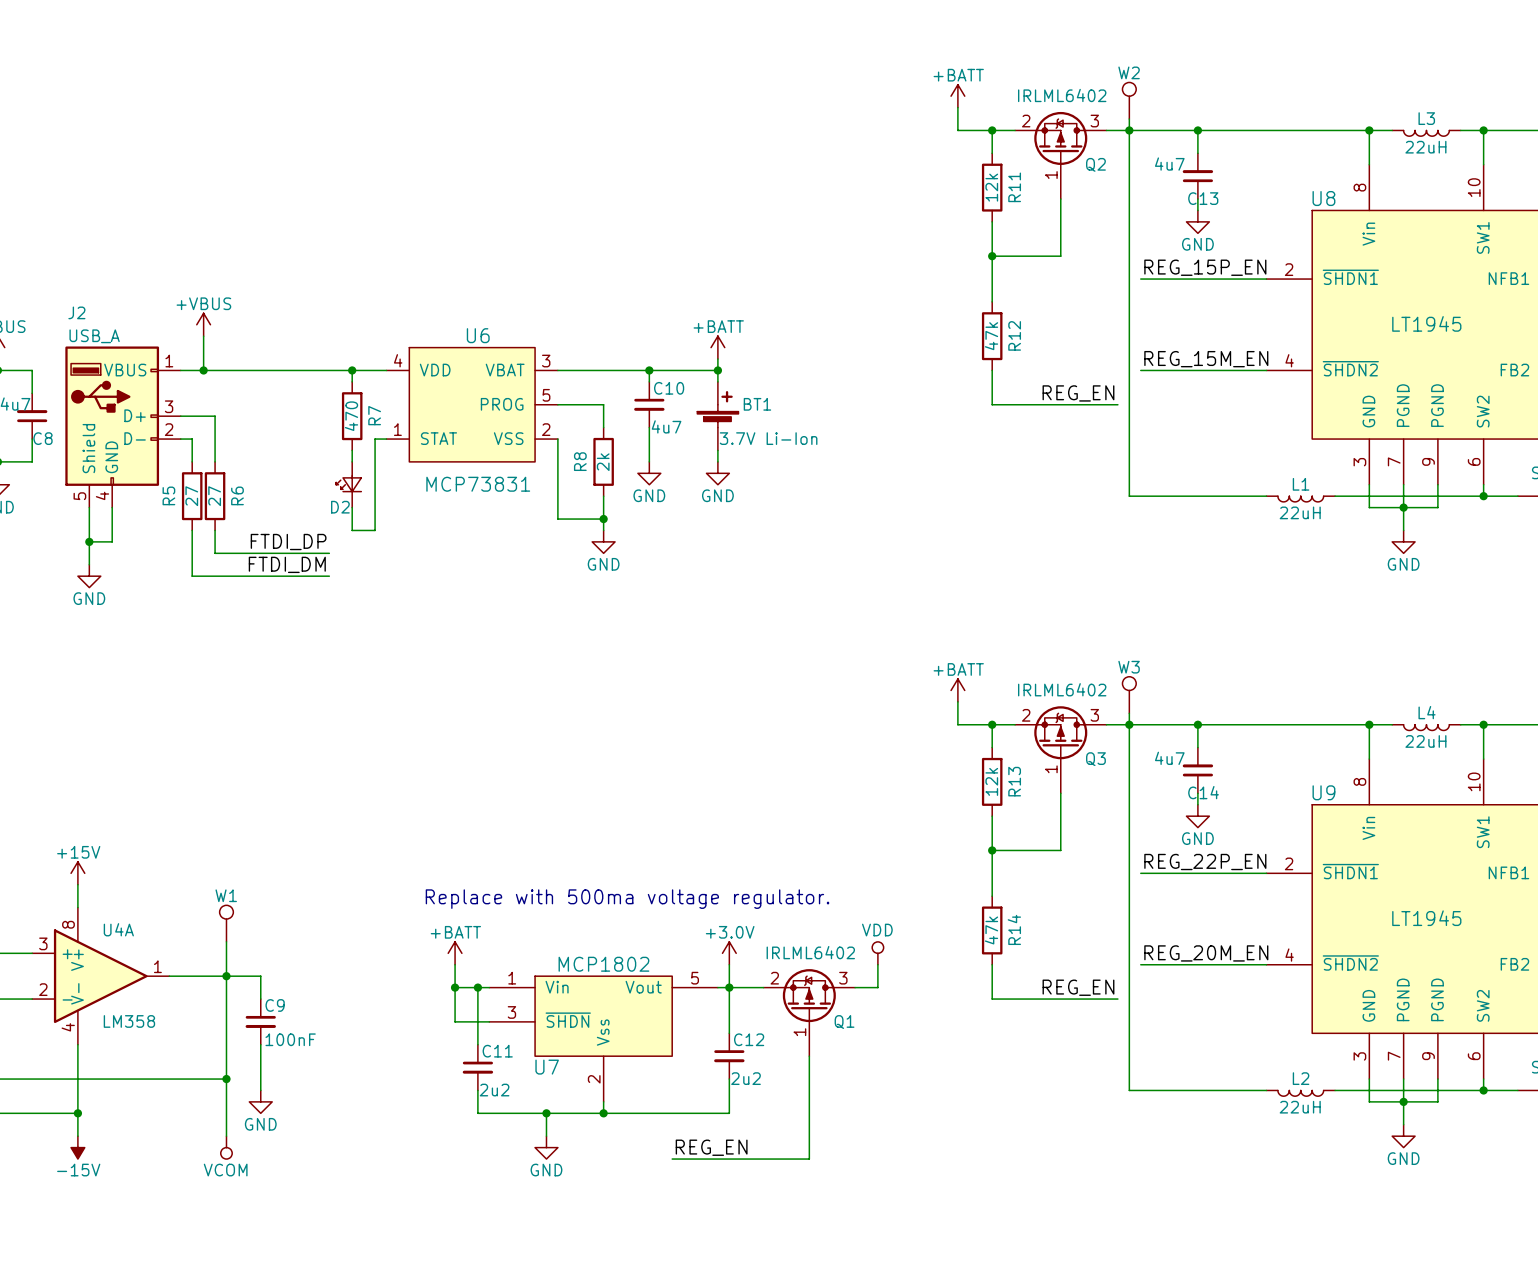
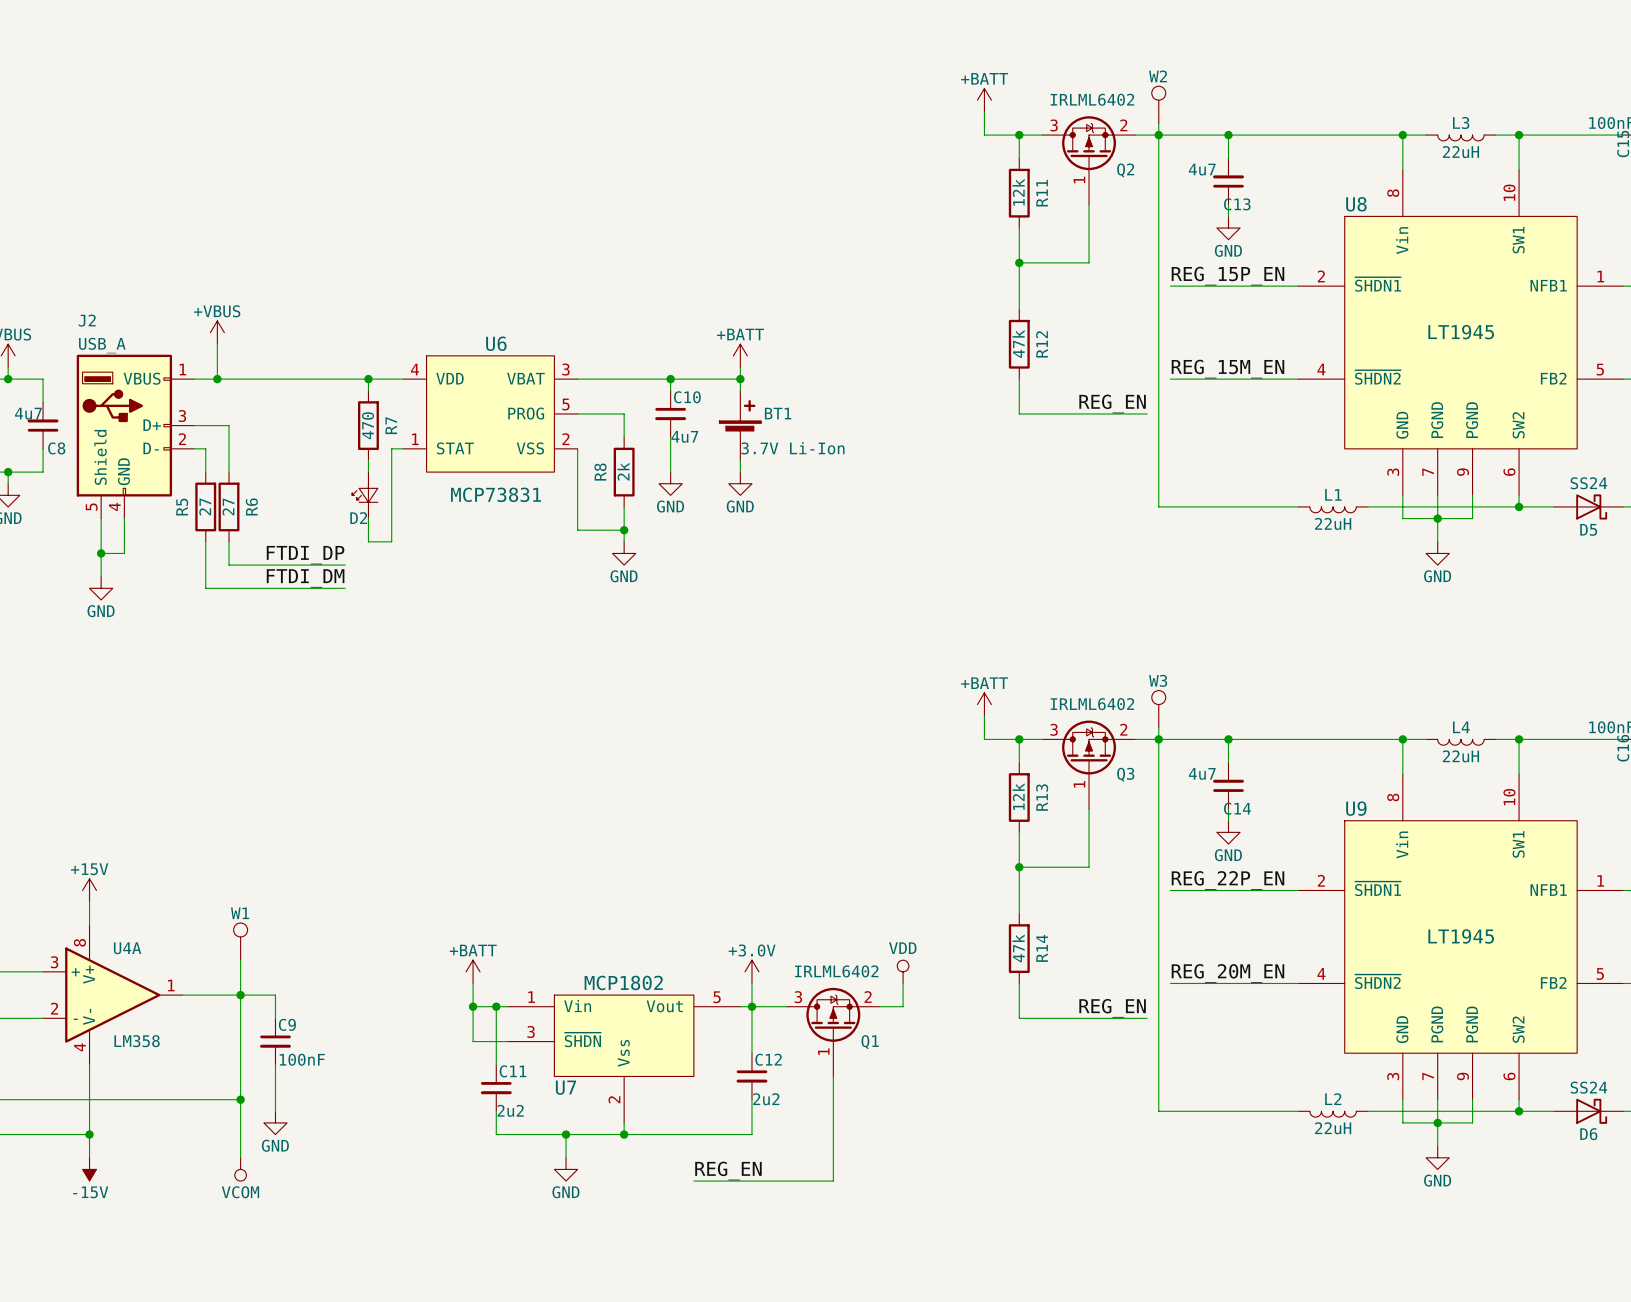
Q2 flip: as is (1060, 138) -> left-right (1089, 143)
Q3 flip: as is (1060, 732) -> left-right (1089, 747)
text: Replace with 500ma voltage regulator. (627, 899) -> none
Q1 flip: as is (809, 995) -> left-right (833, 1014)

